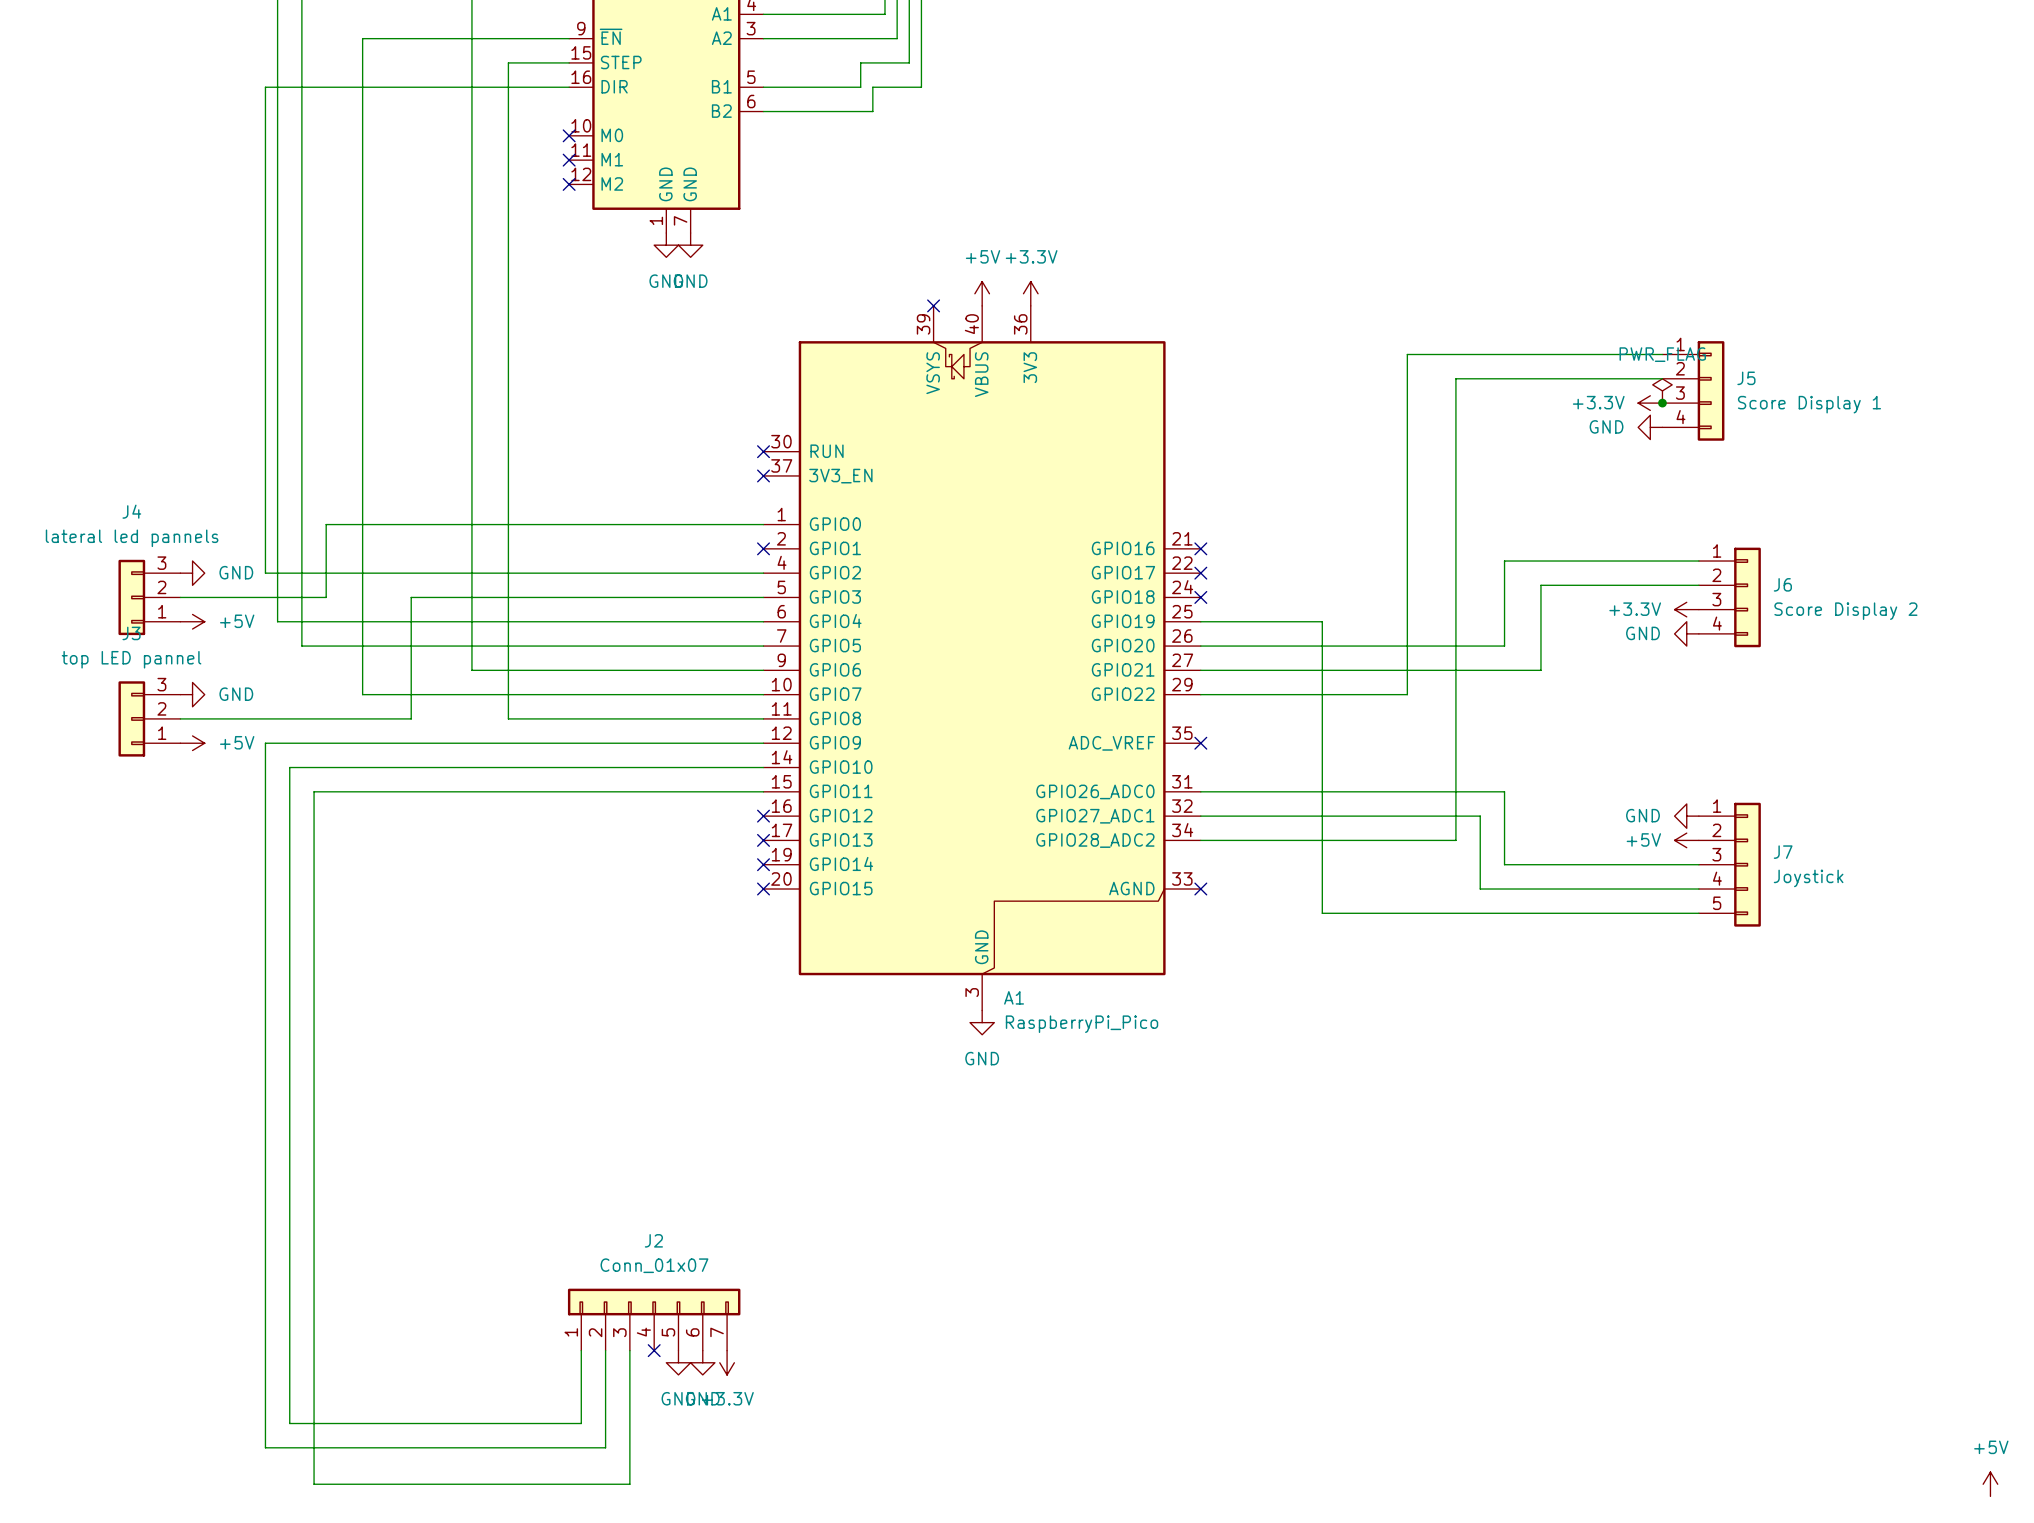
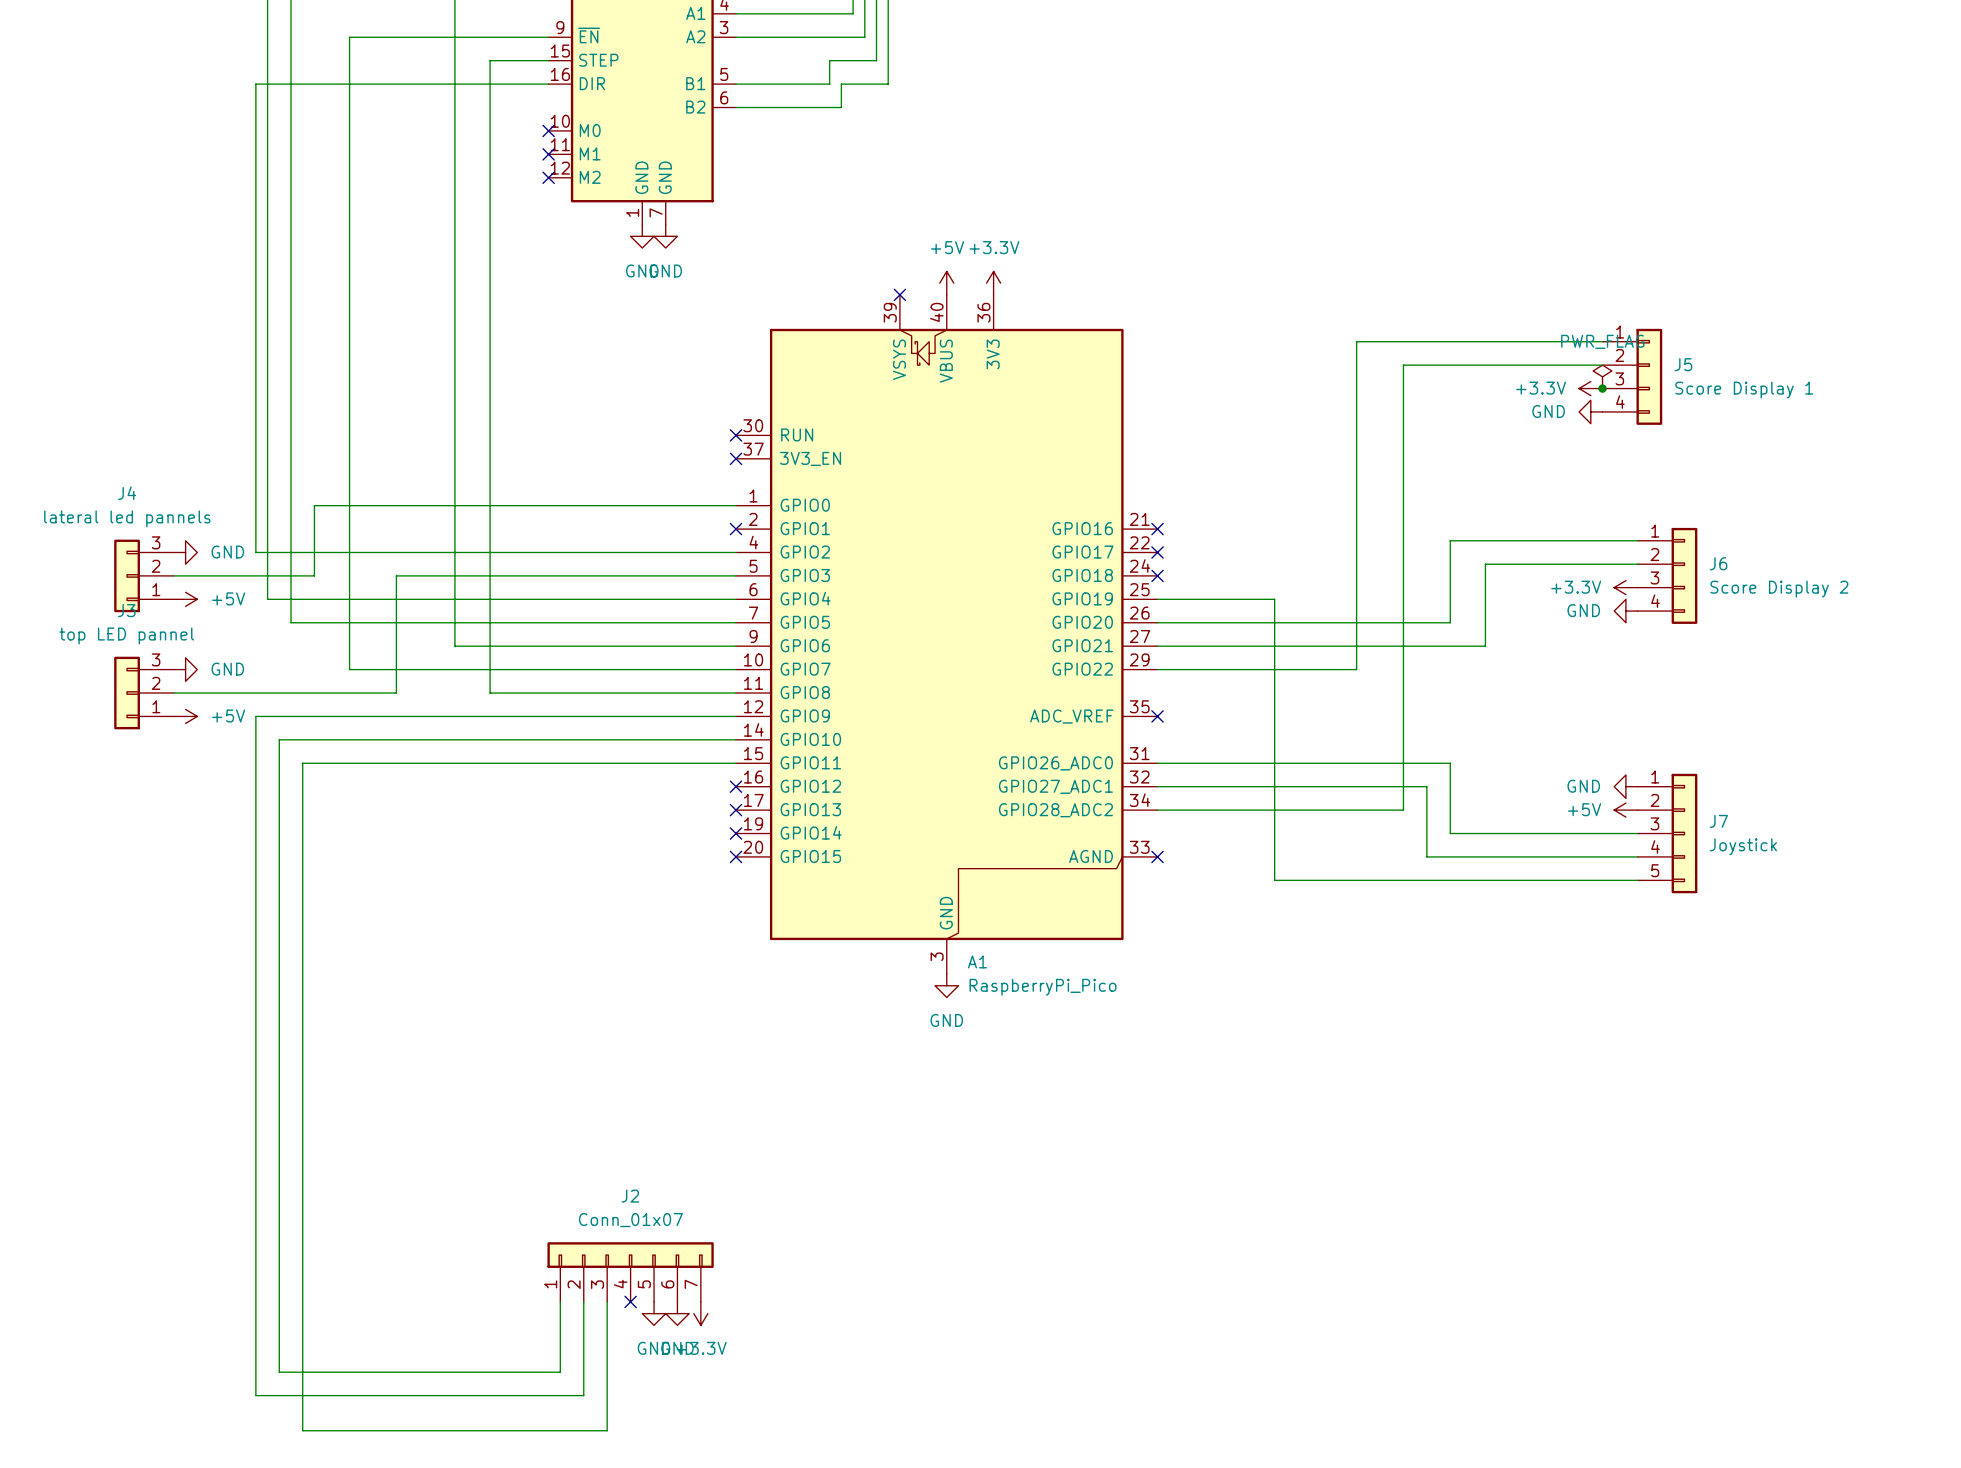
power symbol: +5V (1990, 1484) -> none

